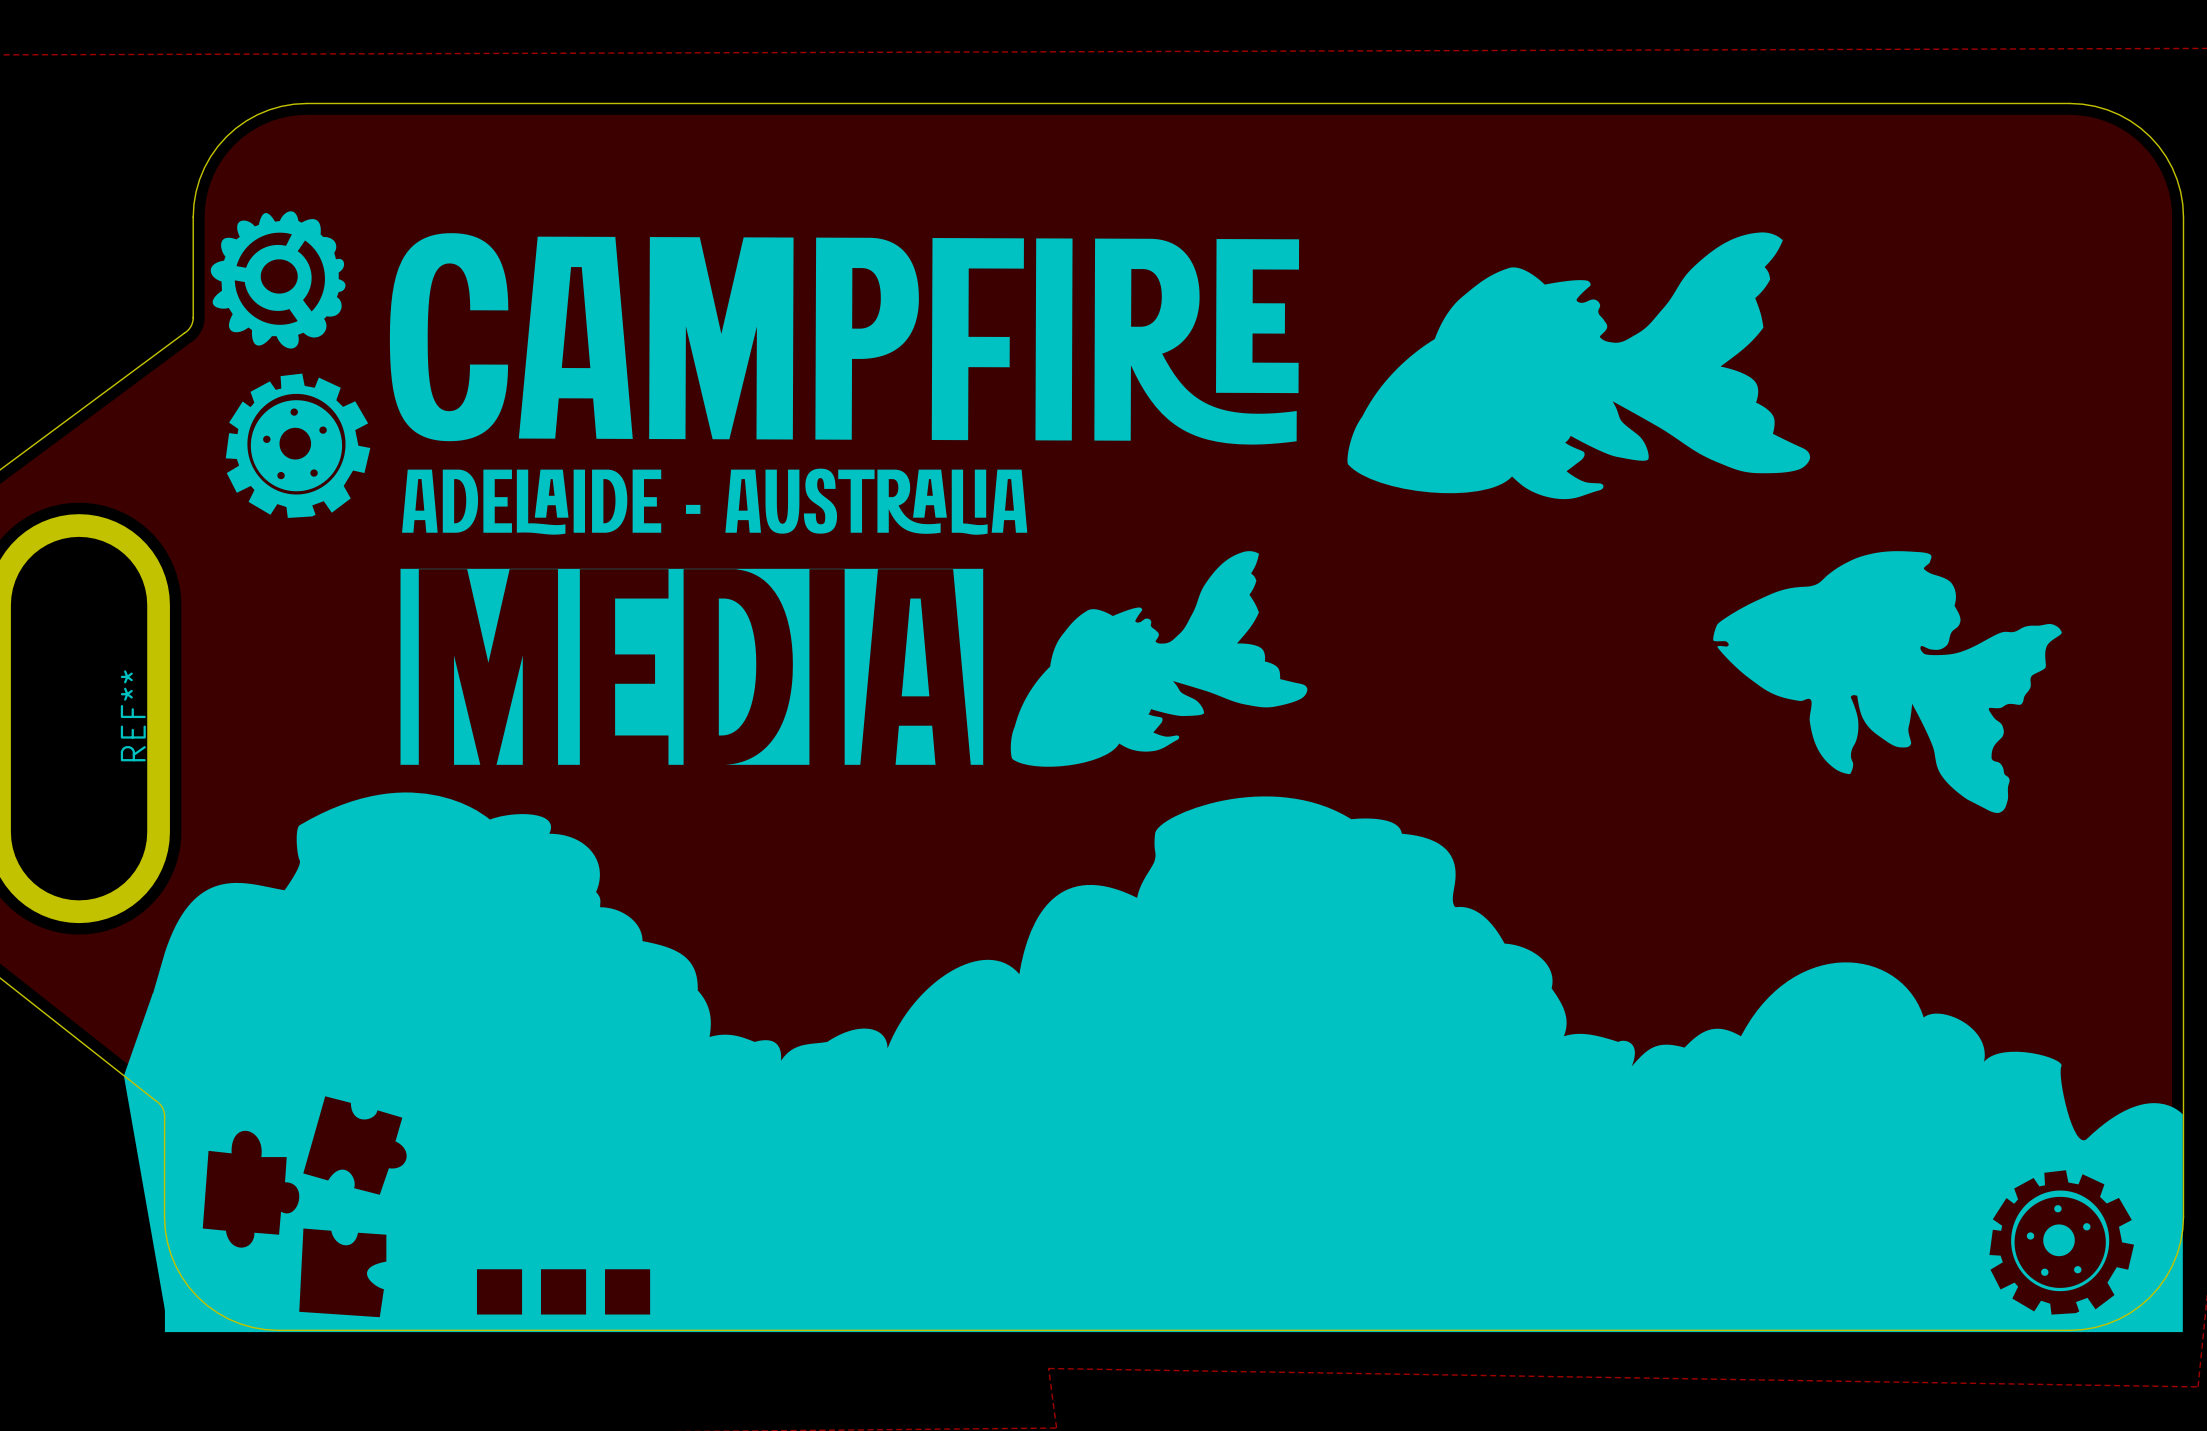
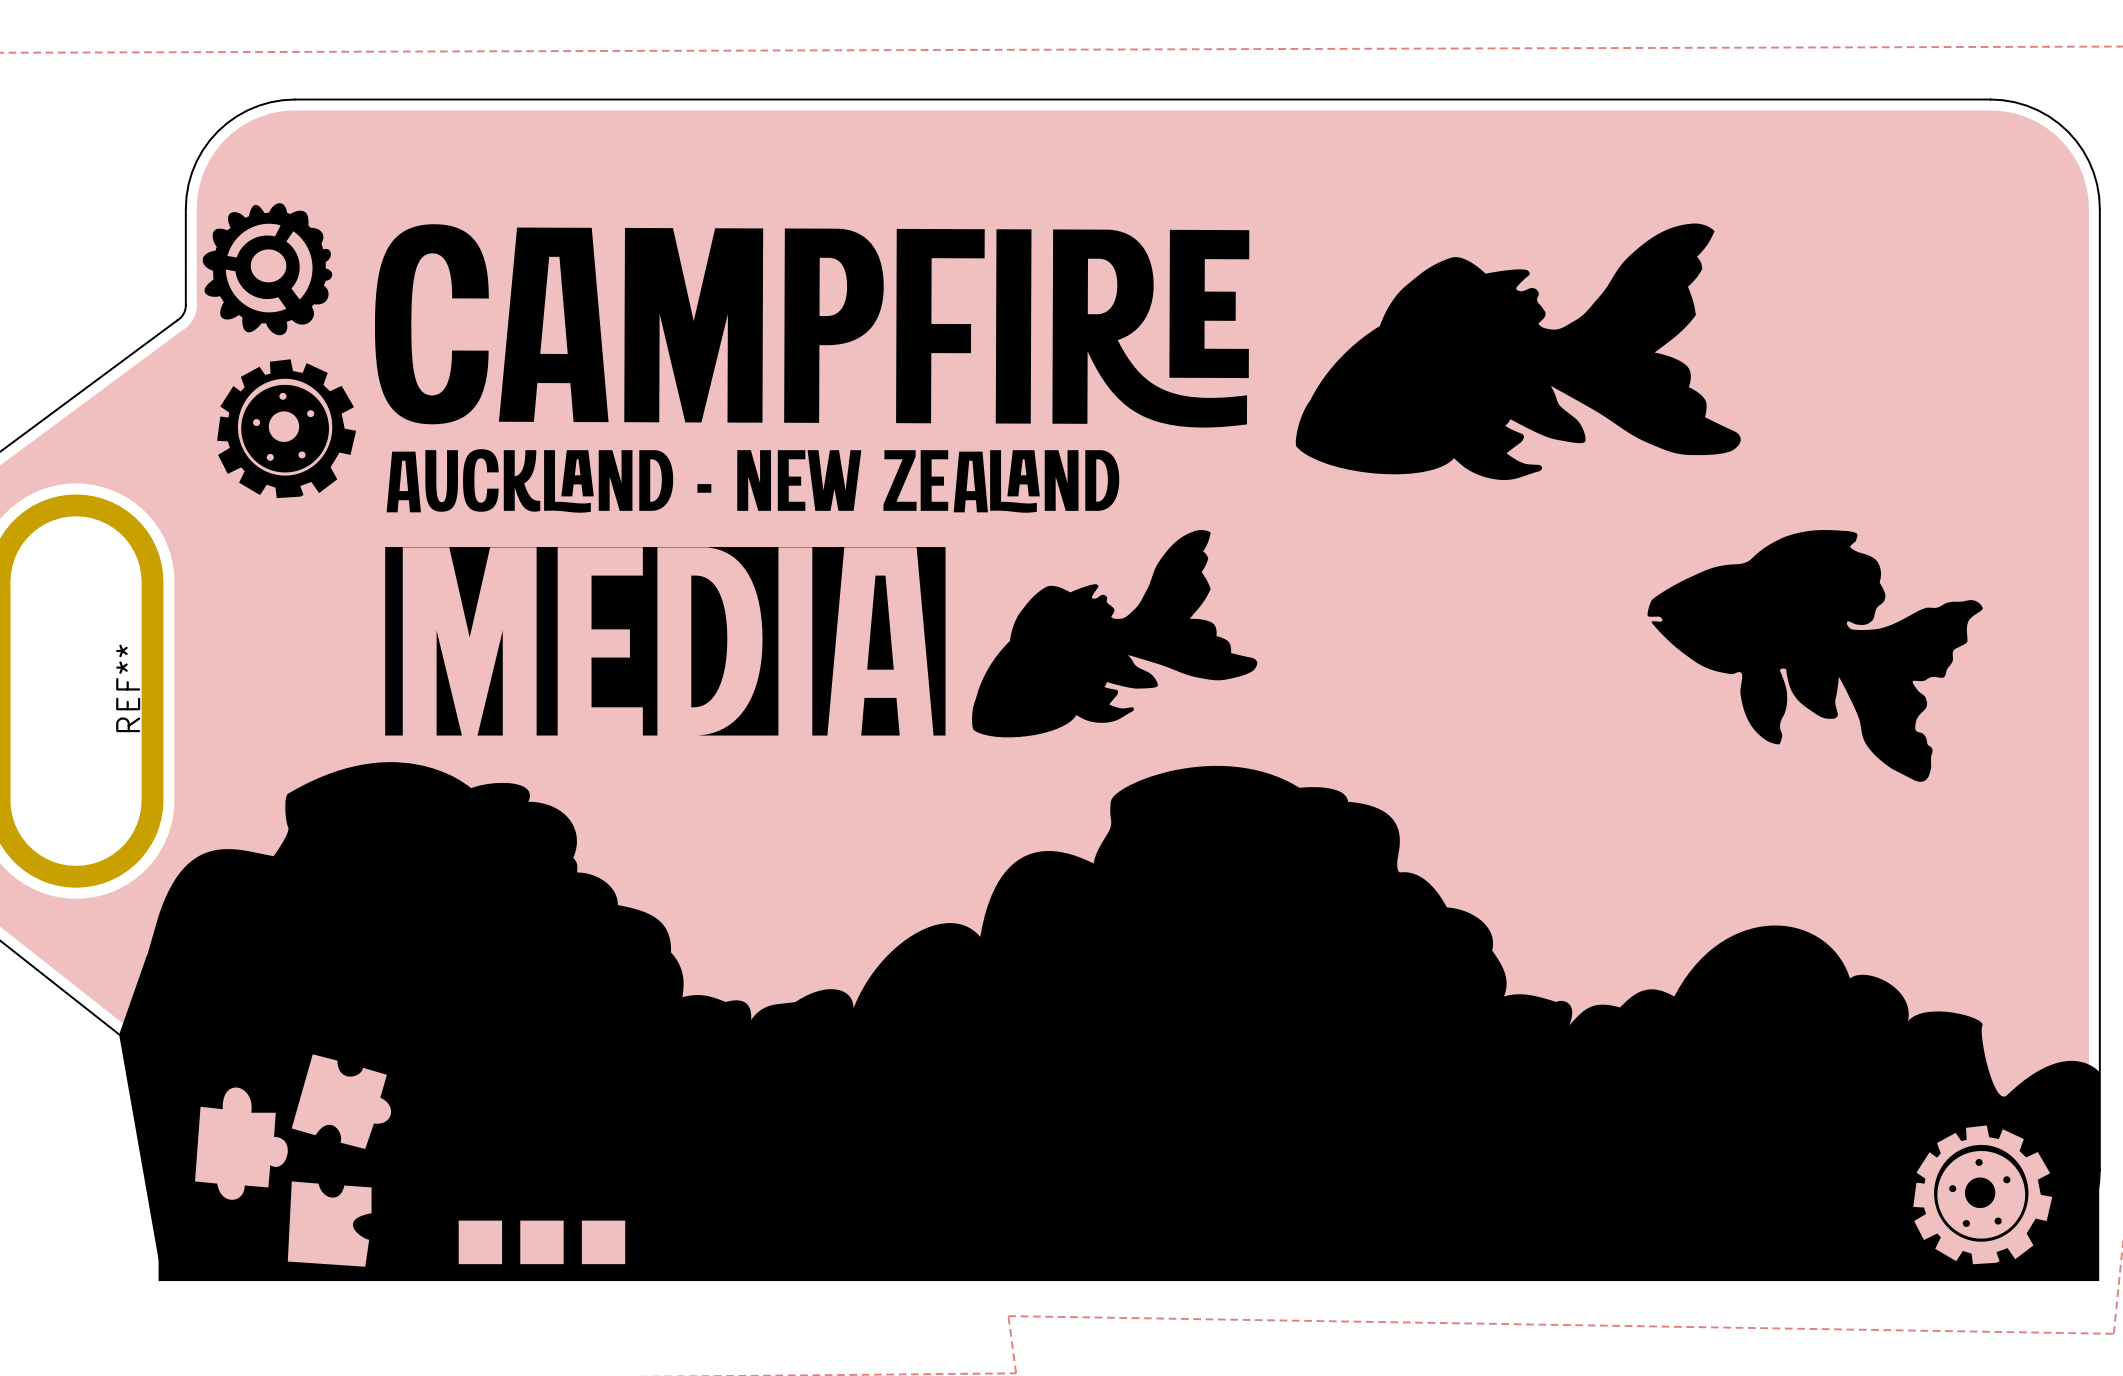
drawing: none -> [503, 450, 541, 512]
drawing: none -> [737, 450, 772, 511]
drawing shape: [803, 468, 838, 534] -> [777, 450, 806, 511]
drawing: none -> [883, 450, 917, 511]
drawing: none -> [990, 450, 1120, 513]
drawing: [442, 469, 479, 533] -> none
drawing shape: [483, 469, 512, 533] -> [463, 449, 499, 512]
drawing: [573, 469, 585, 533] -> none
drawing shape: [632, 469, 662, 533] -> [598, 450, 633, 511]
drawing: [725, 469, 762, 533] -> none
drawing shape: [838, 469, 875, 533] -> [807, 450, 862, 511]
drawing: [877, 469, 941, 534] -> none
drawing shape: [951, 469, 988, 535] -> [920, 450, 949, 511]
drawing: [974, 469, 987, 518] -> none
drawing position: (551, 493) -> (577, 473)
drawing position: (929, 493) -> (1023, 473)
drawing position: (609, 501) -> (656, 480)
drawing position: (782, 501) -> (441, 480)
drawing position: (541, 502) -> (567, 481)
drawing position: (693, 509) -> (704, 488)

